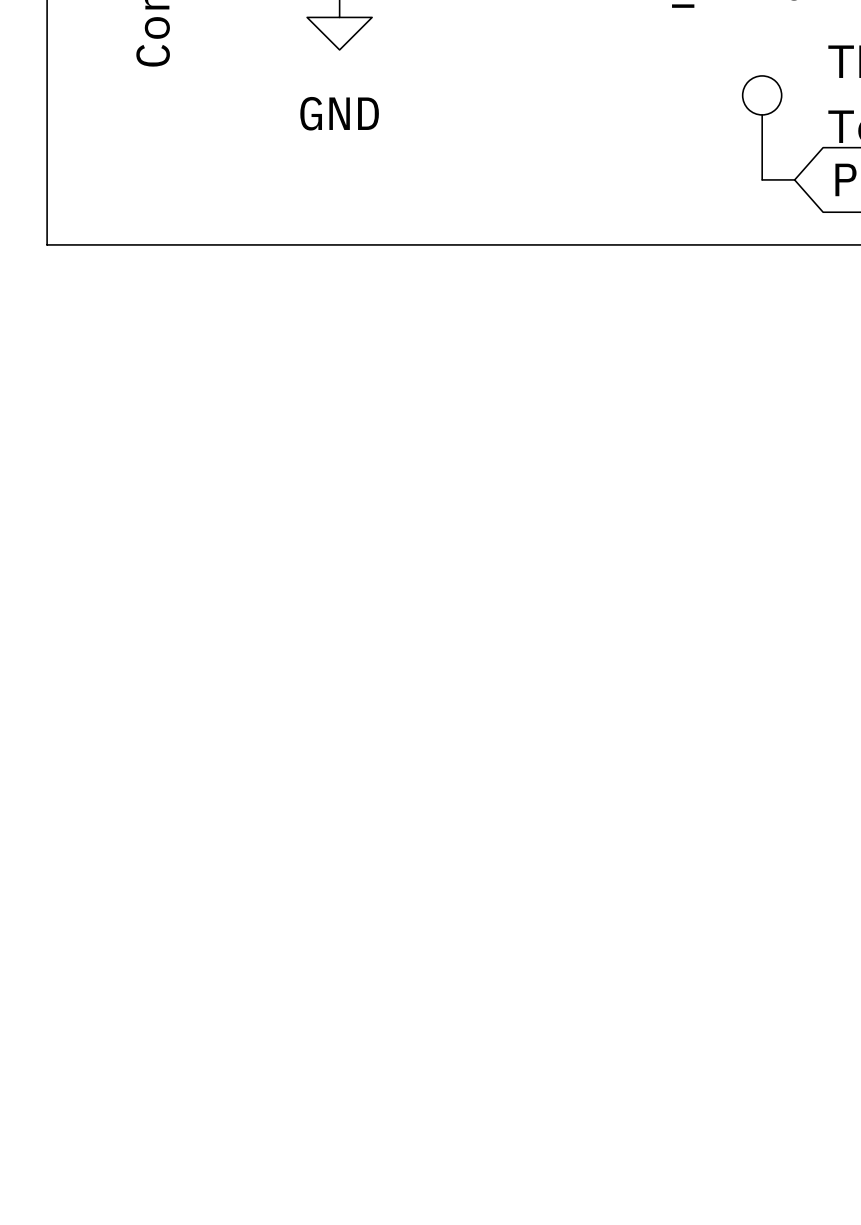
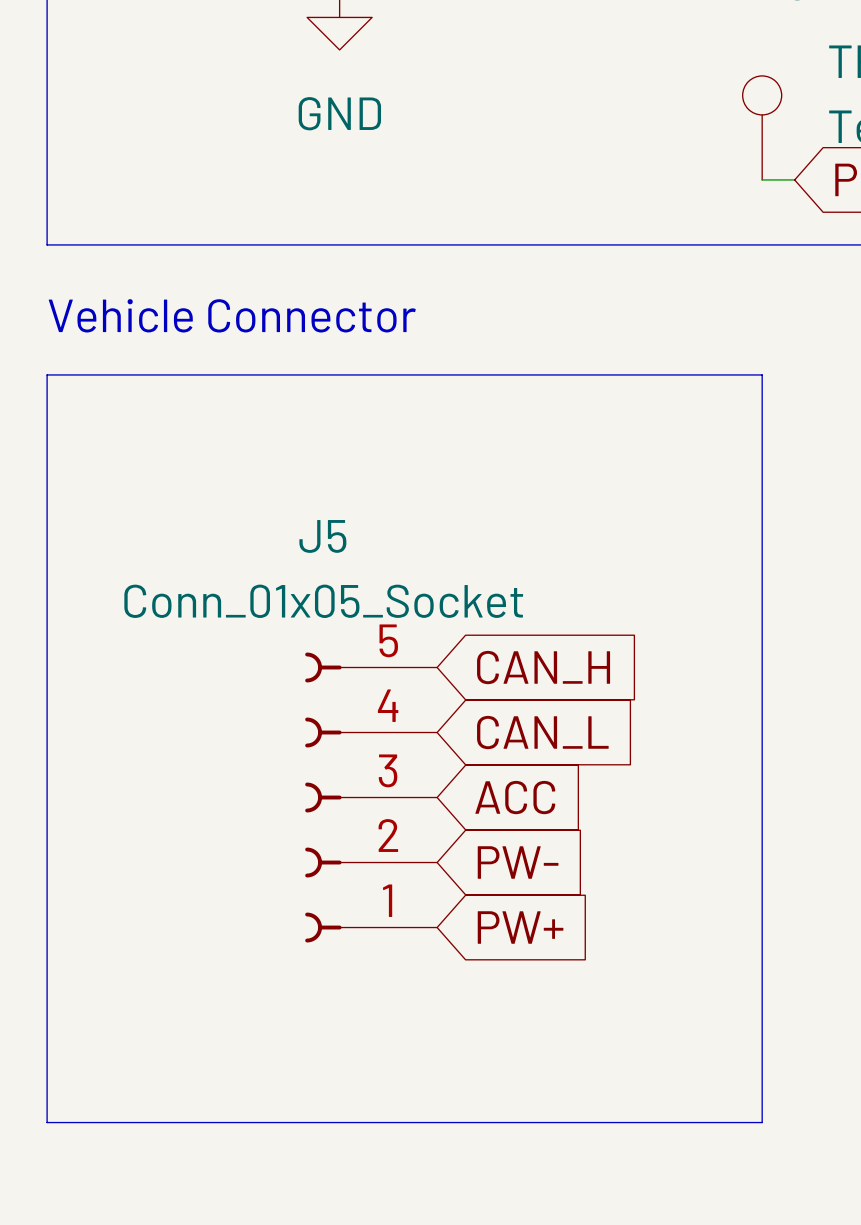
text: none -> Vehicle Connector (232, 315)
line: none -> (47, 374) (47, 1122) (762, 1122) (762, 374) (47, 374)
global label: none -> CAN_H (543, 667)
global label: none -> CAN_L (542, 732)
J5: none -> Conn_01x05_Socket (371, 797)
global label: none -> ACC (515, 797)
global label: none -> PW- (518, 862)
global label: none -> PW+ (520, 927)

